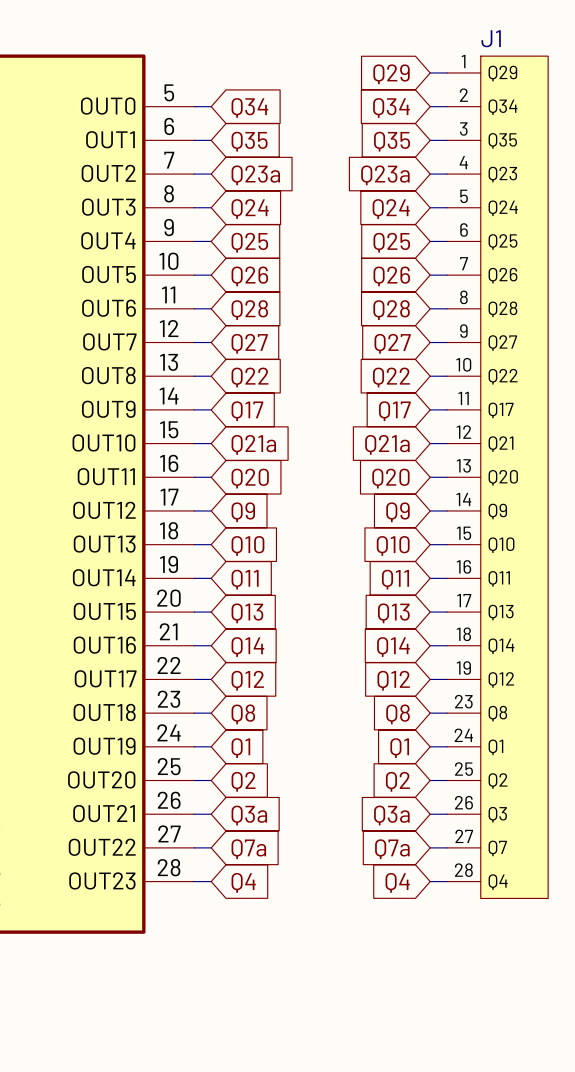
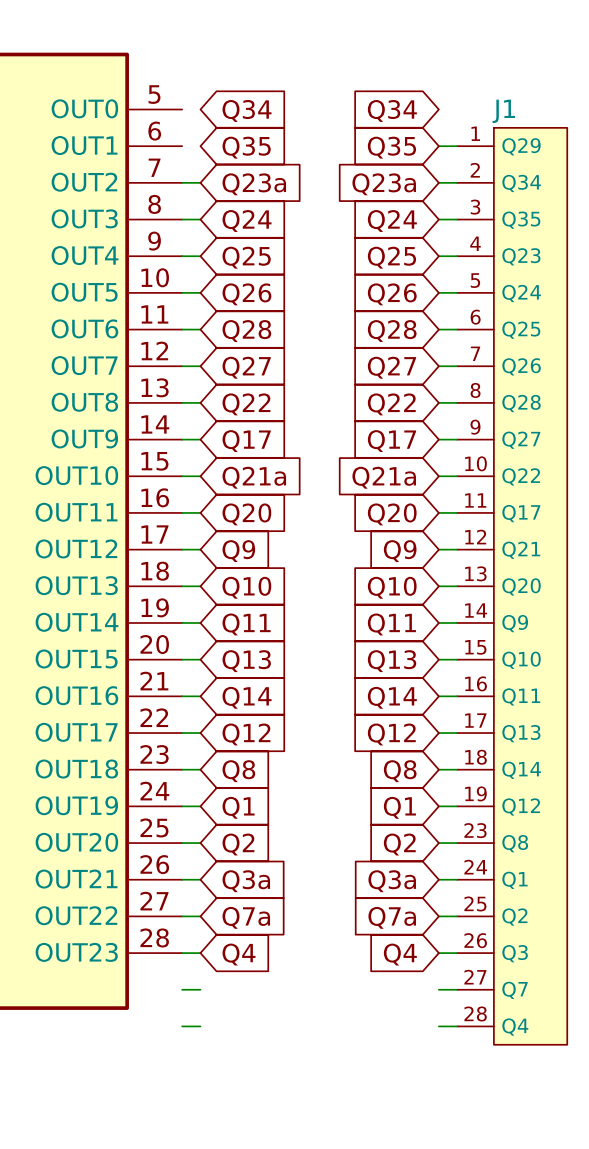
wire: (430, 72) (447, 72) -> none
global label: Q29 (391, 74) -> none
wire: (194, 106) (211, 106) -> none
wire: (430, 106) (447, 106) -> none
wire: (194, 140) (211, 140) -> none
J1 position: (497, 477) -> (512, 586)
wire: none -> (182, 989) (200, 989)
wire: none -> (438, 989) (457, 989)
wire: none -> (182, 1026) (200, 1026)
wire: none -> (438, 1026) (457, 1026)

